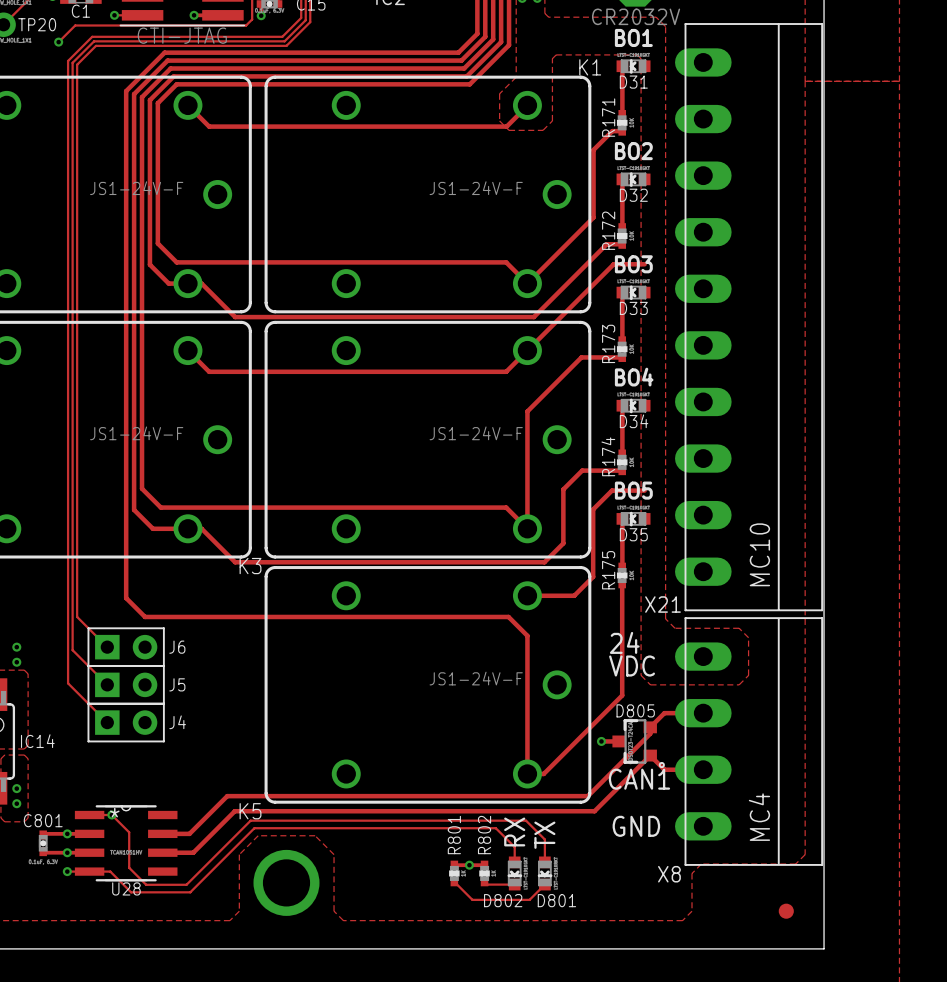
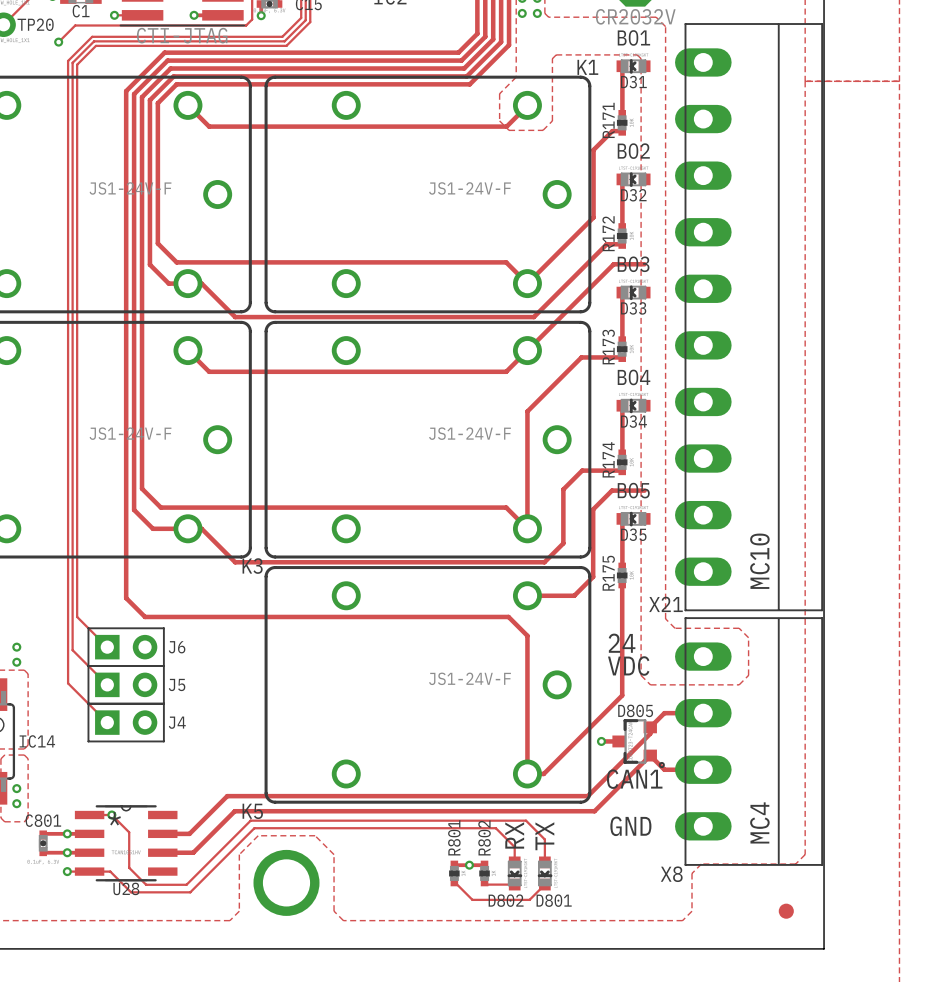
via: none -> (522, 13)
via: none -> (537, 13)

